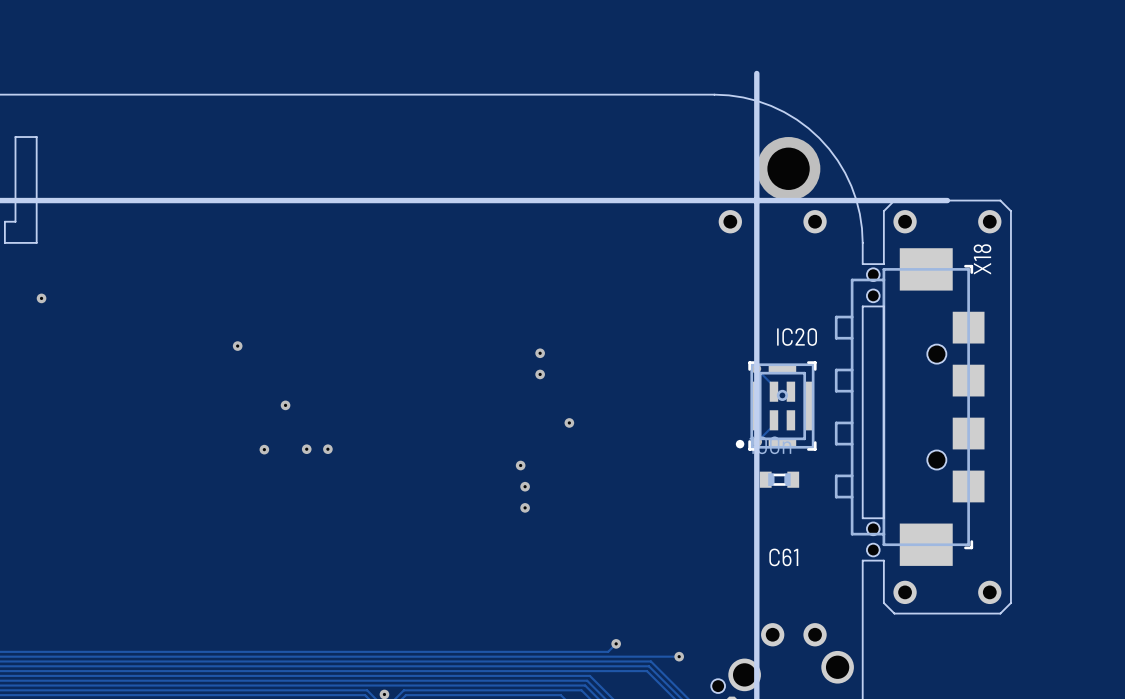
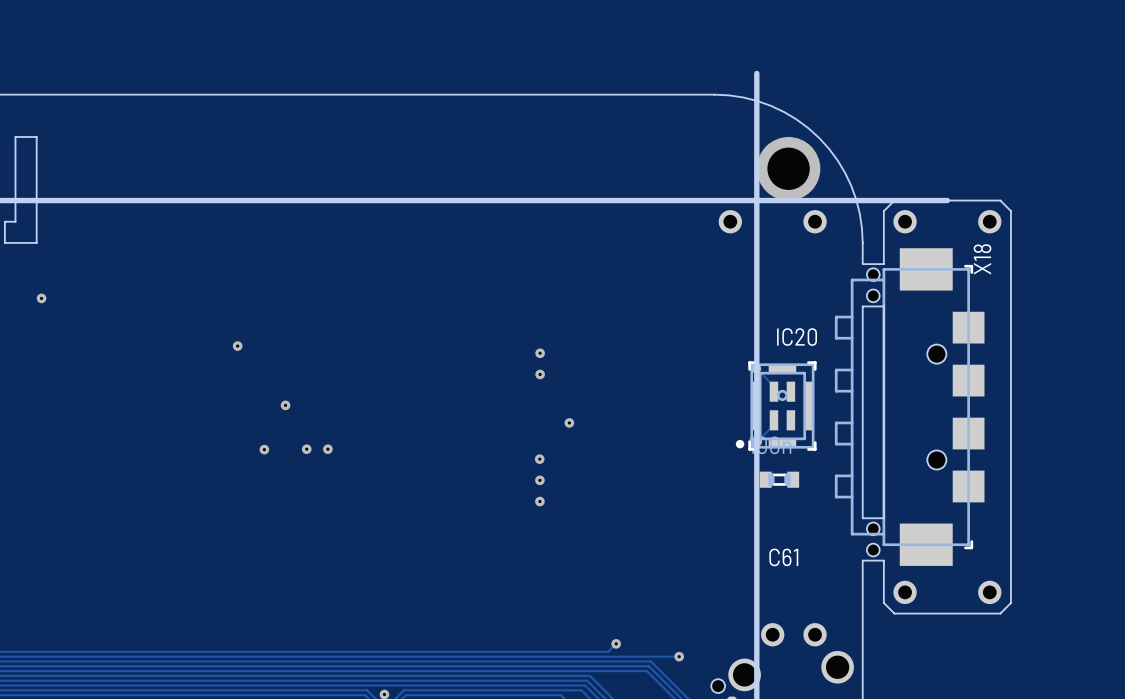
via: none -> (539, 459)
via: (520, 465) -> none
via: none -> (539, 480)
via: (525, 486) -> none
via: none -> (539, 501)
via: (525, 507) -> none

